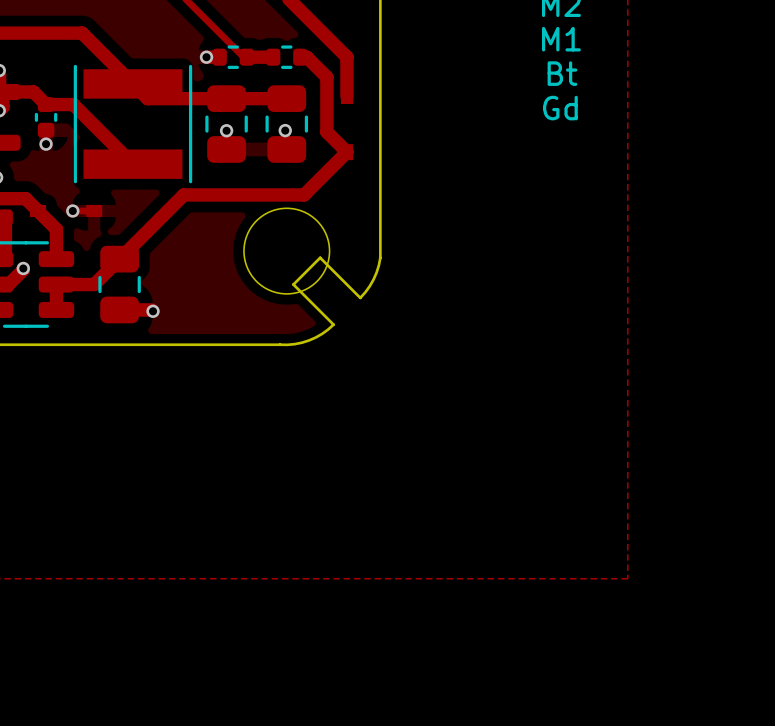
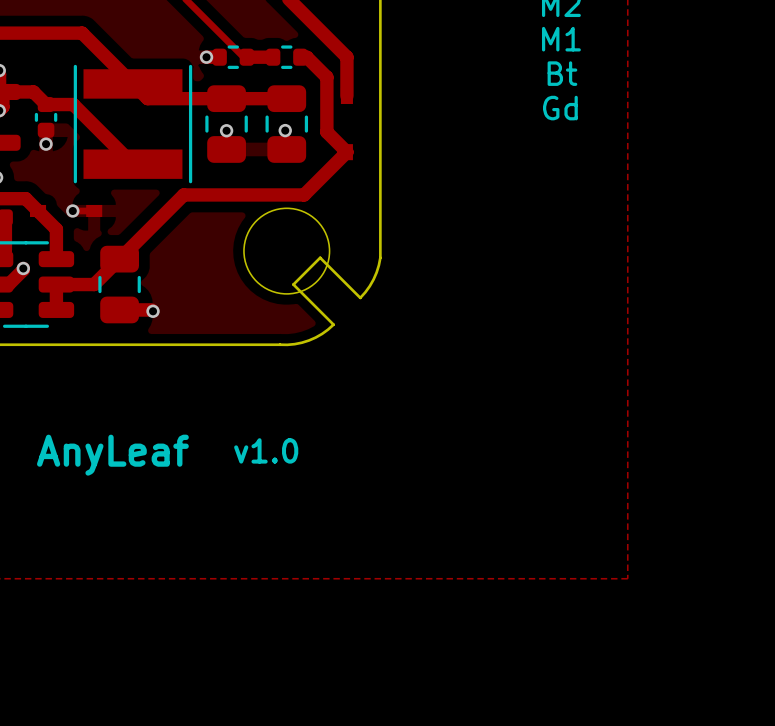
text: none -> v1.0 (266, 450)
text: none -> AnyLeaf (112, 455)

